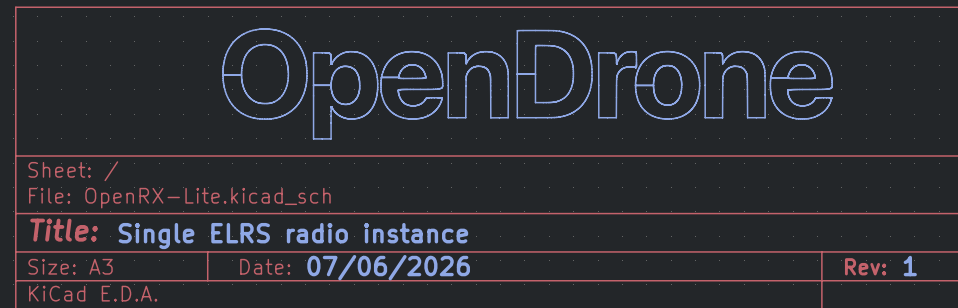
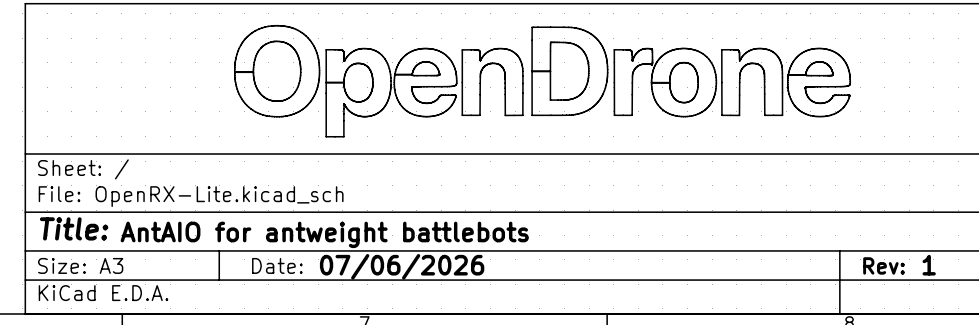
text: Single ELRS radio instance (293, 236) -> none
text: none -> AntAIO for antweight battlebots (324, 234)

